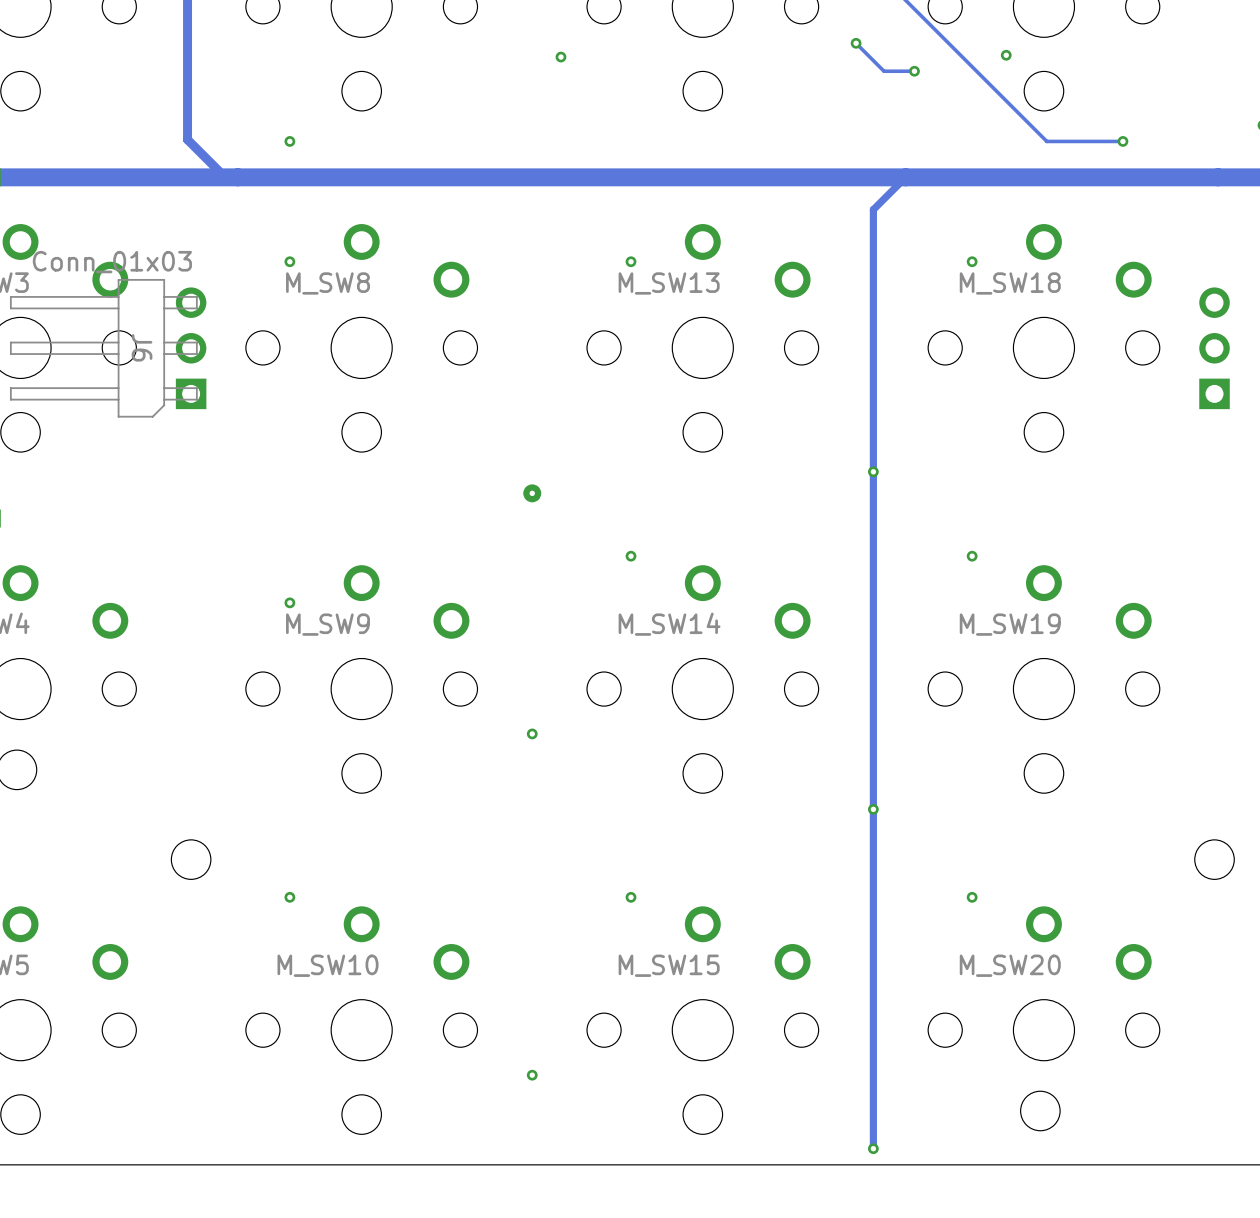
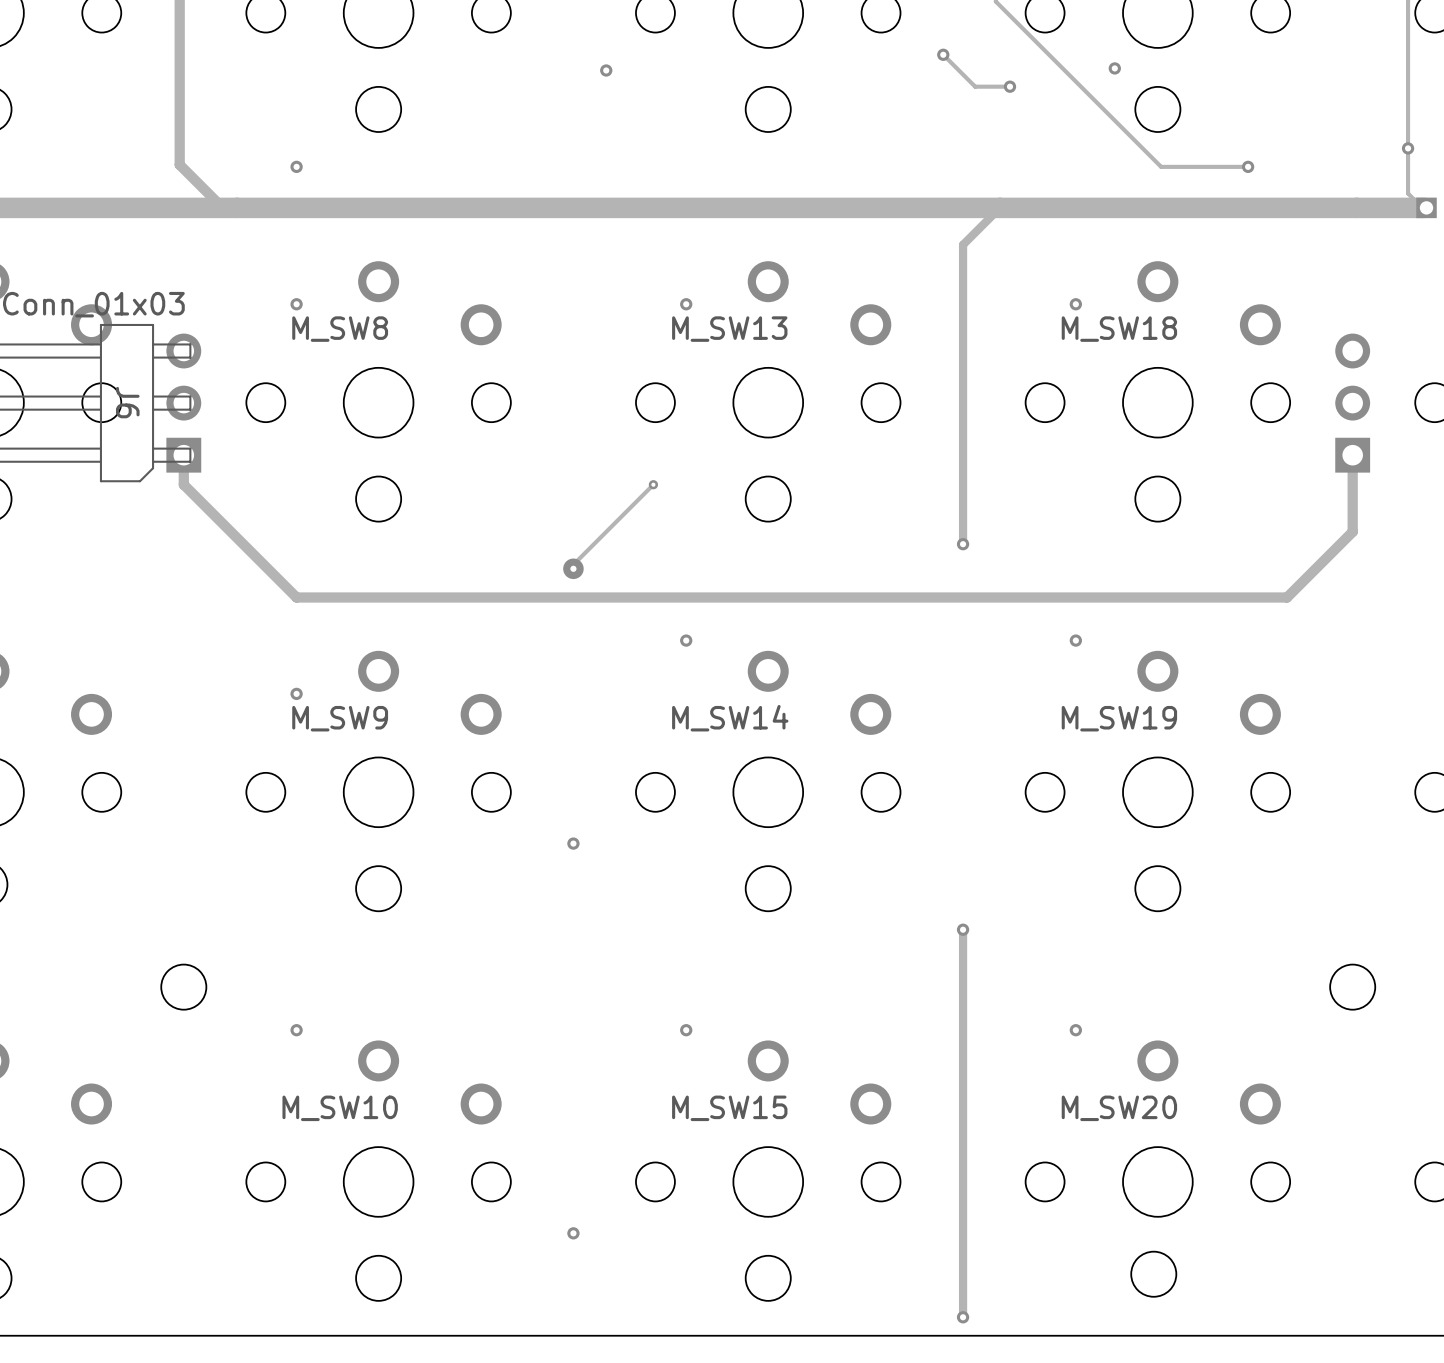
track: none -> (1352, 455) (1352, 531) (1287, 597) (296, 597) (183, 484) (183, 455)
track: none -> (653, 484) (573, 564) (573, 568)
via: none -> (653, 484)
track: (873, 471) (873, 809) -> none

